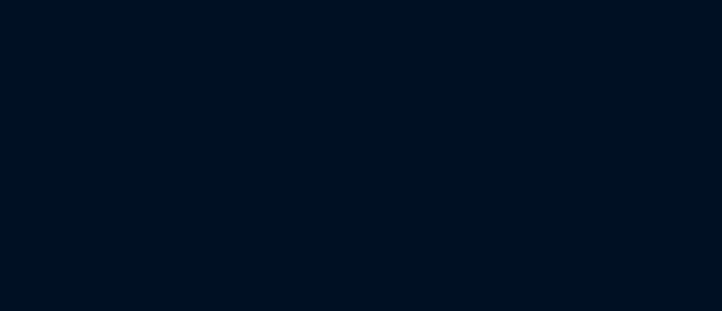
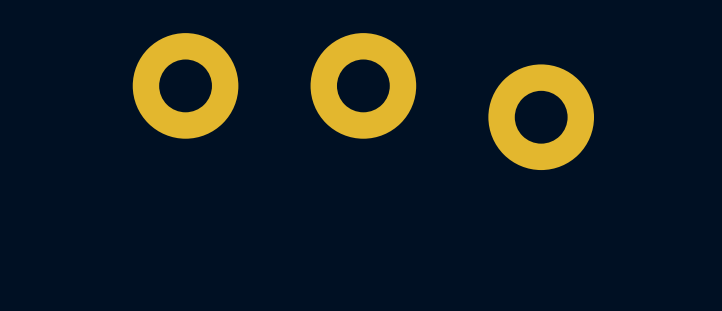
part: none -> (185, 85)
part: none -> (363, 85)
part: none -> (541, 117)

